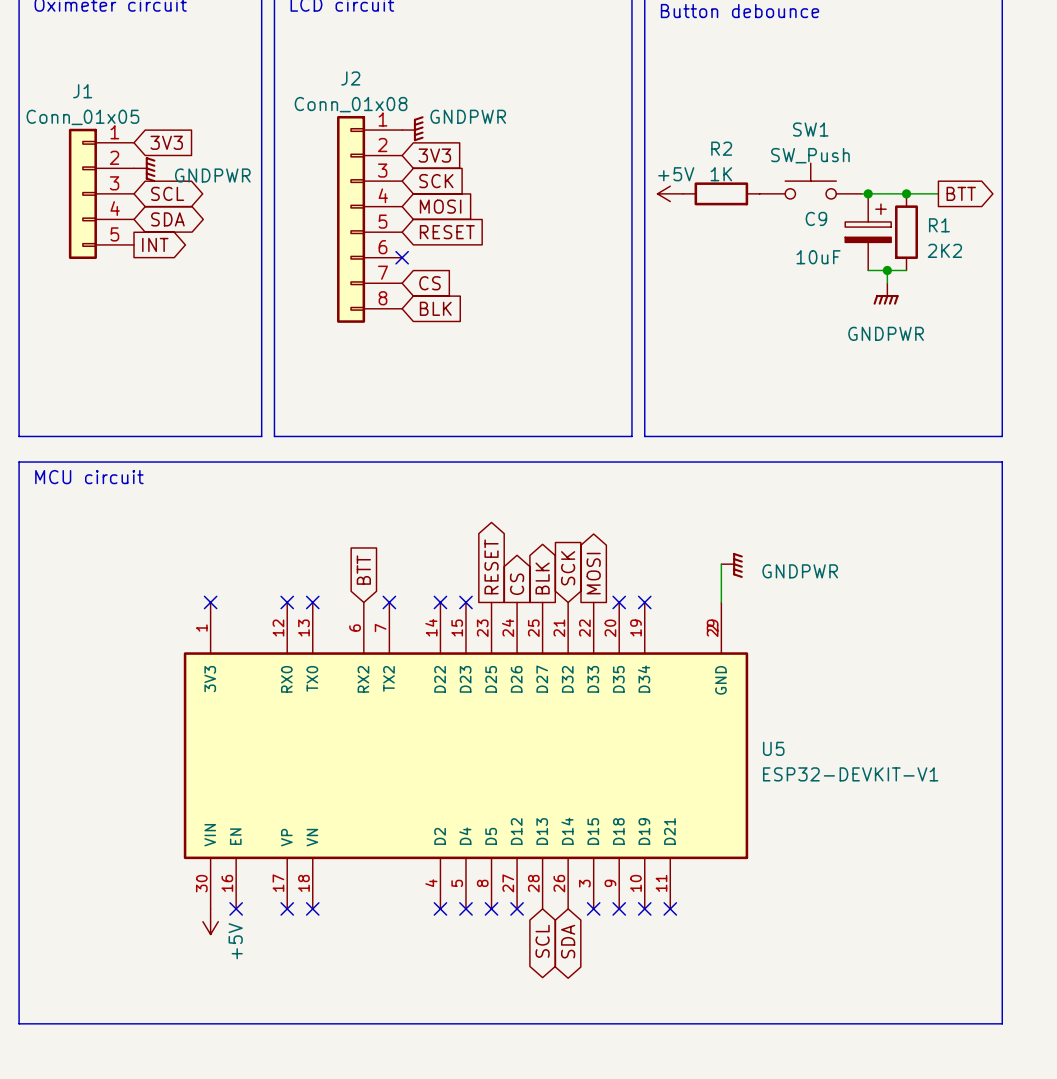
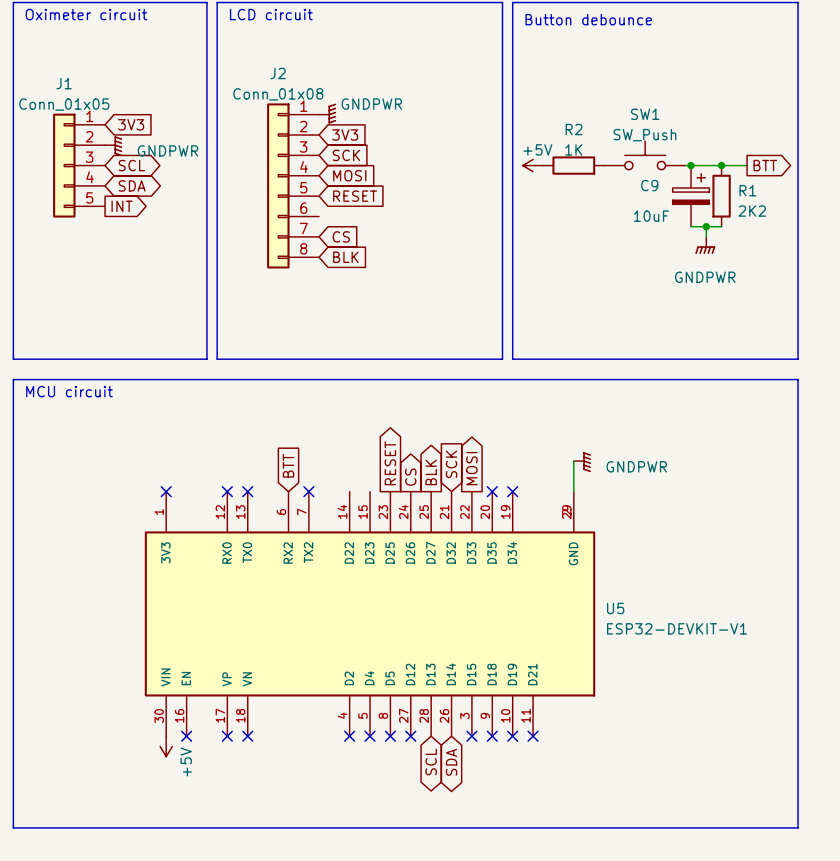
no-connect mark: (402, 257) -> none
no-connect mark: (440, 602) -> none
no-connect mark: (465, 602) -> none

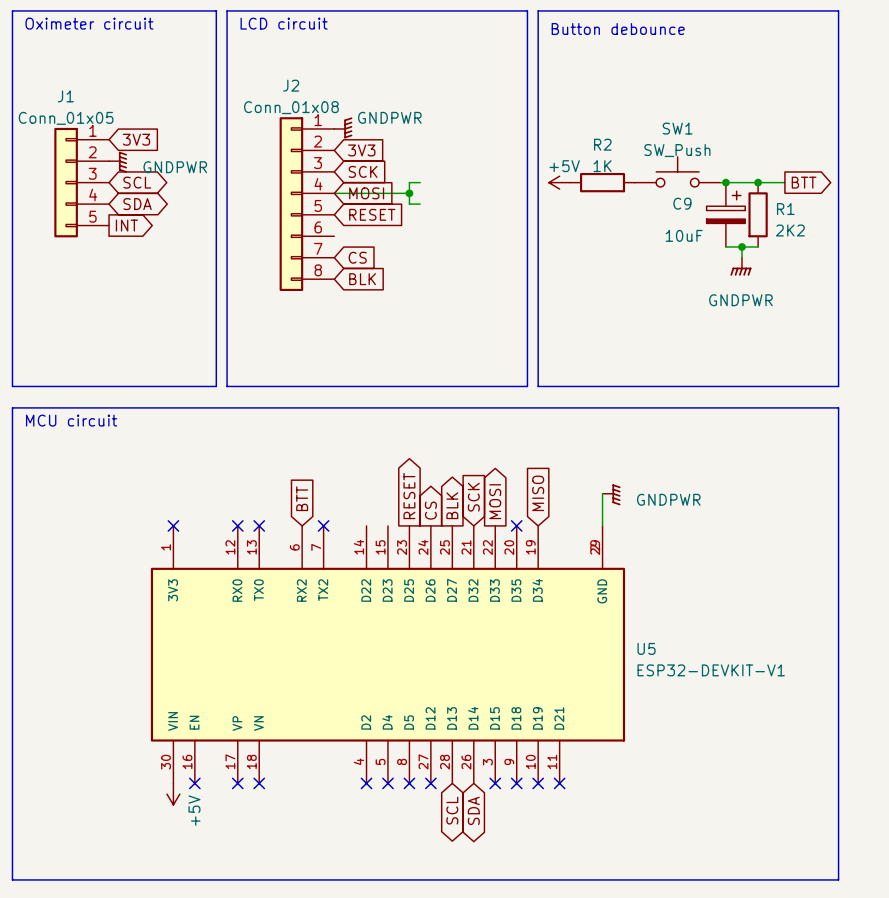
wire: none -> (420, 182) (409, 182) (409, 204) (420, 204)
wire: none -> (334, 193) (409, 193)
junction: none -> (409, 193)
global label: none -> MISO (538, 493)
no-connect mark: (512, 491) -> none

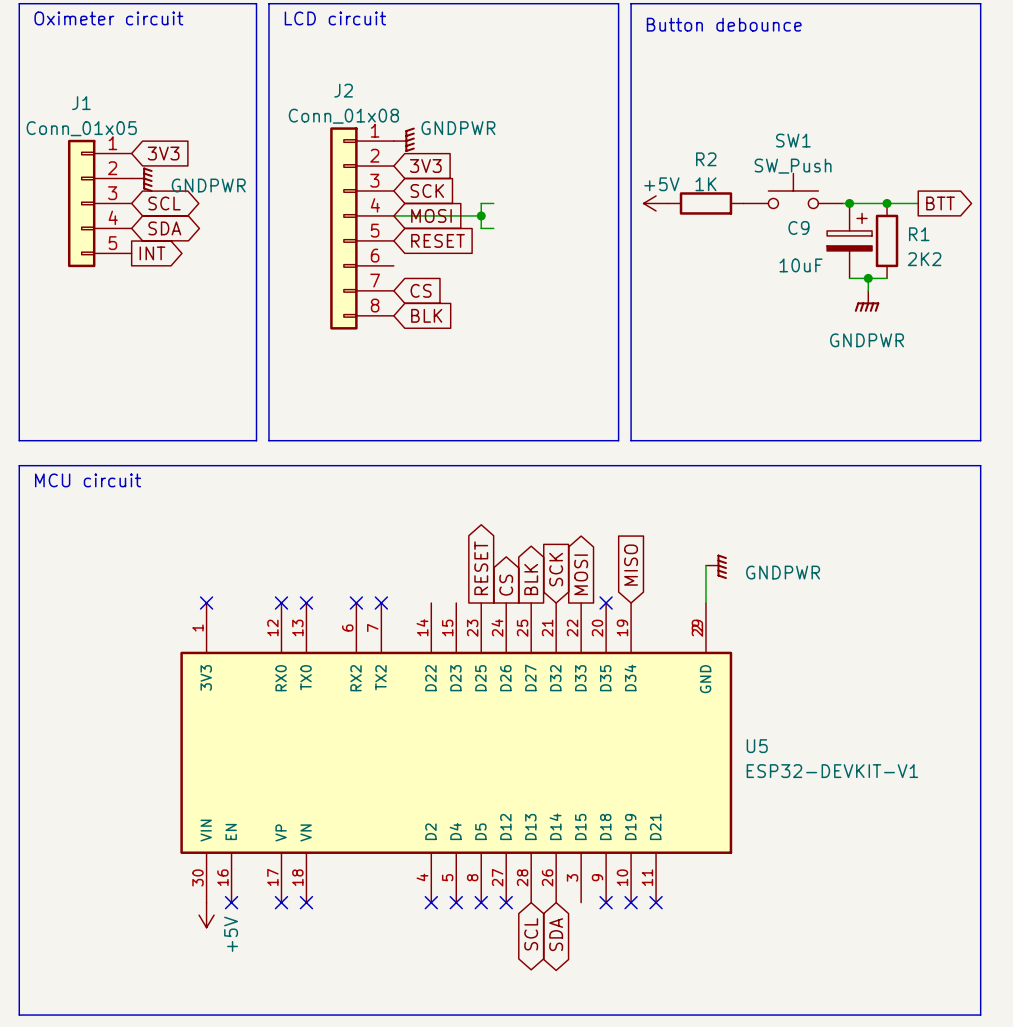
global label: BTT (302, 498) -> none
no-connect mark: none -> (356, 603)
no-connect mark: (495, 783) -> none

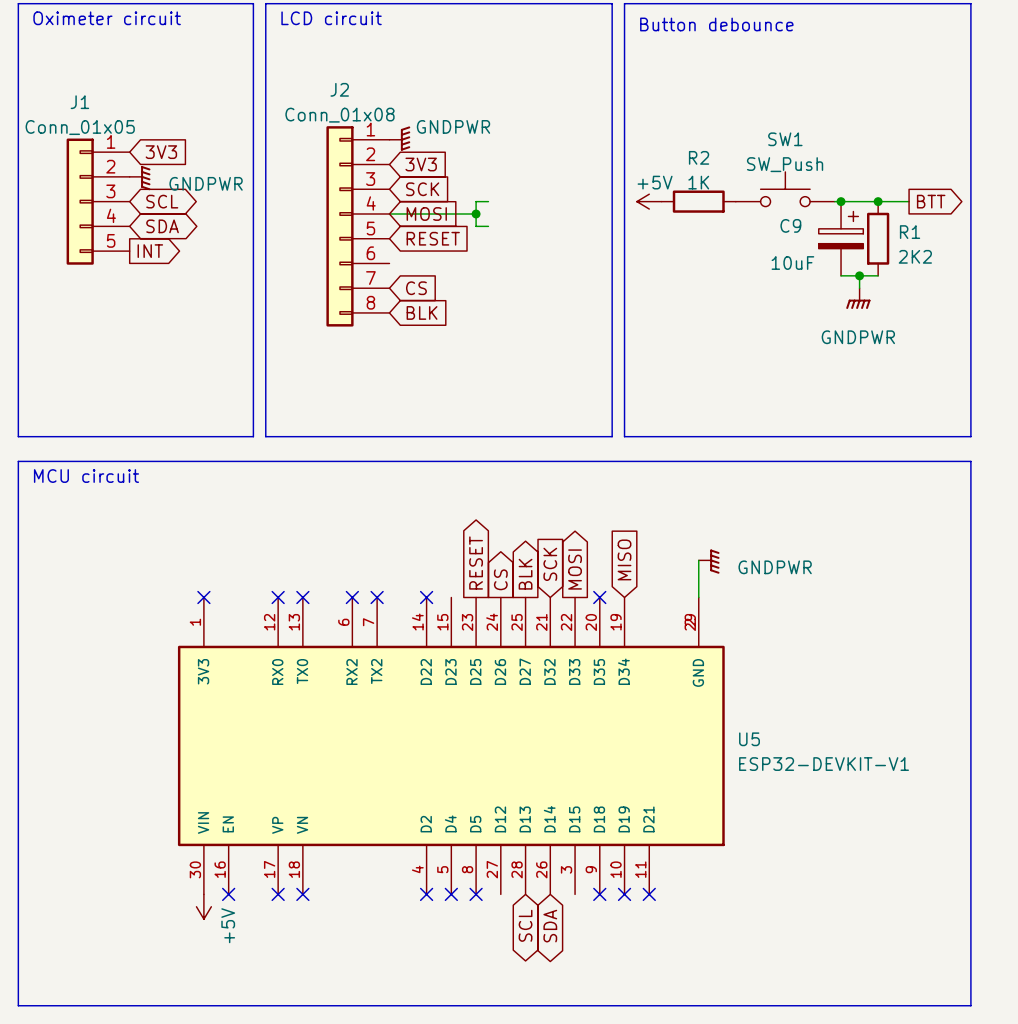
no-connect mark: none -> (426, 597)
no-connect mark: (506, 902) -> none

